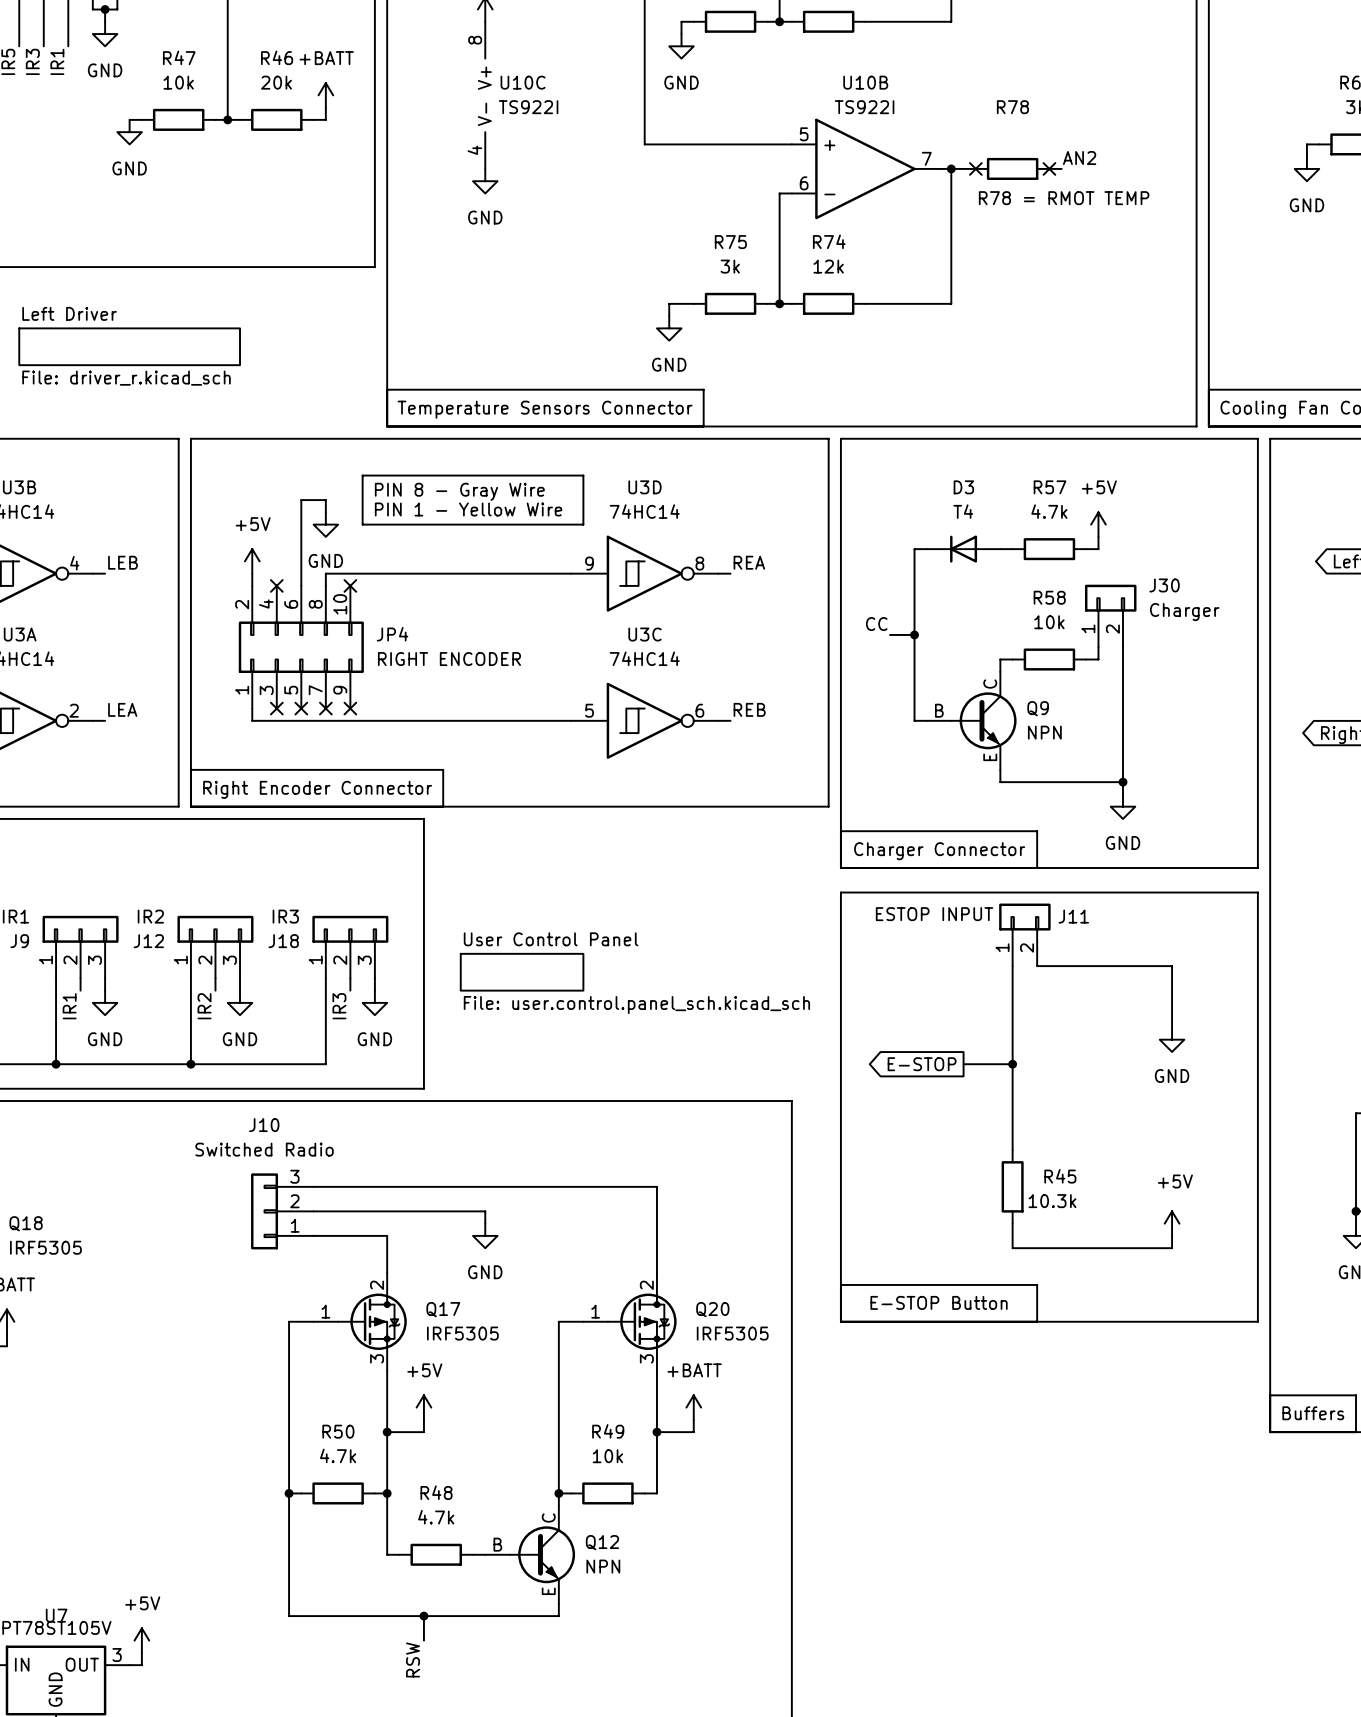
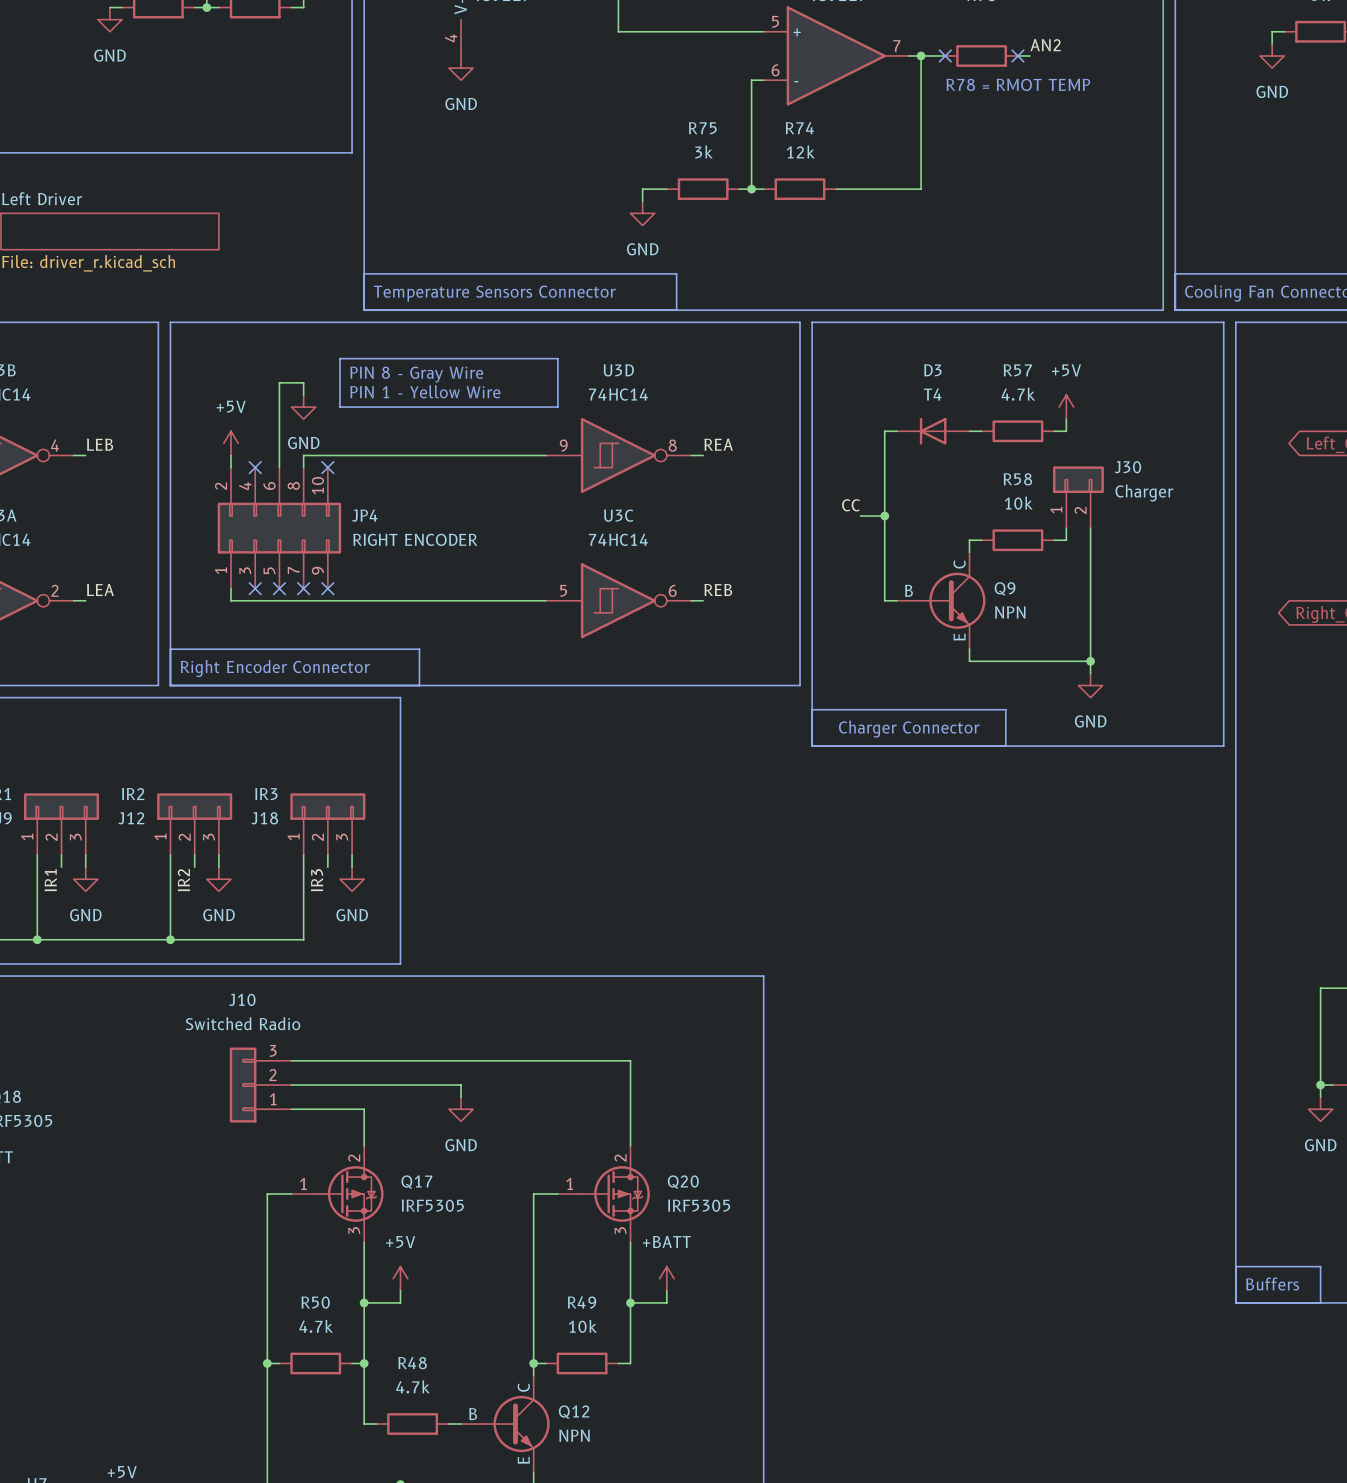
line: (840, 892) (1257, 892) (1257, 1321) (840, 1321) (840, 892) -> none
J11: ESTOP INPUT (1024, 934) -> none
wire: (1012, 966) (1012, 1150) -> none
wire: (1037, 966) (1172, 966) (1172, 1027) -> none
sheet User Control Panel: File: user.control.panel_sch.kicad_sch (522, 972) -> none
power symbol: GND (1172, 1039) -> none
global label: E-STOP (922, 1064) -> none
wire: (963, 1064) (1012, 1064) -> none
junction: (1012, 1064) -> none
R45: 10.3k (1012, 1186) -> none
wire: (1012, 1223) (1012, 1248) (1172, 1248) (1172, 1235) -> none
power symbol: +5V (1172, 1223) -> none
line: (840, 1284) (1037, 1284) (1037, 1321) -> none
text: E-STOP Button (939, 1302) -> none

